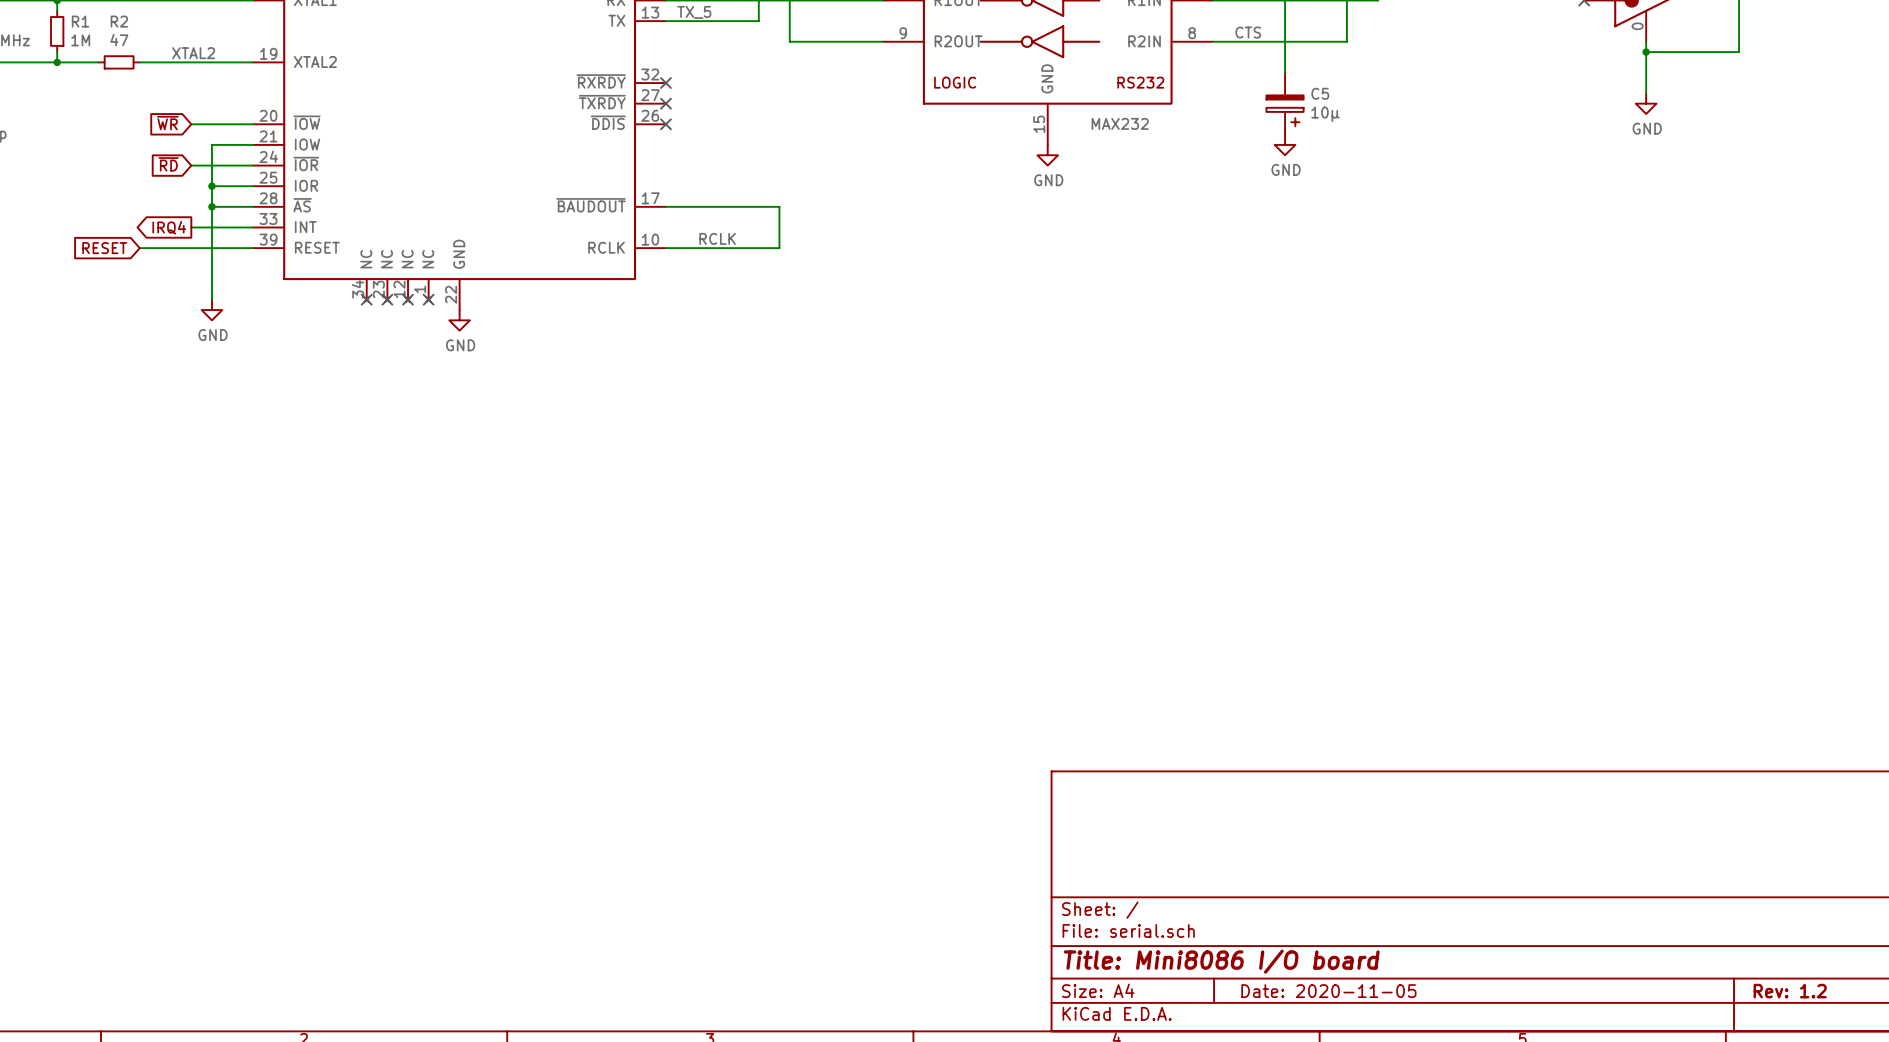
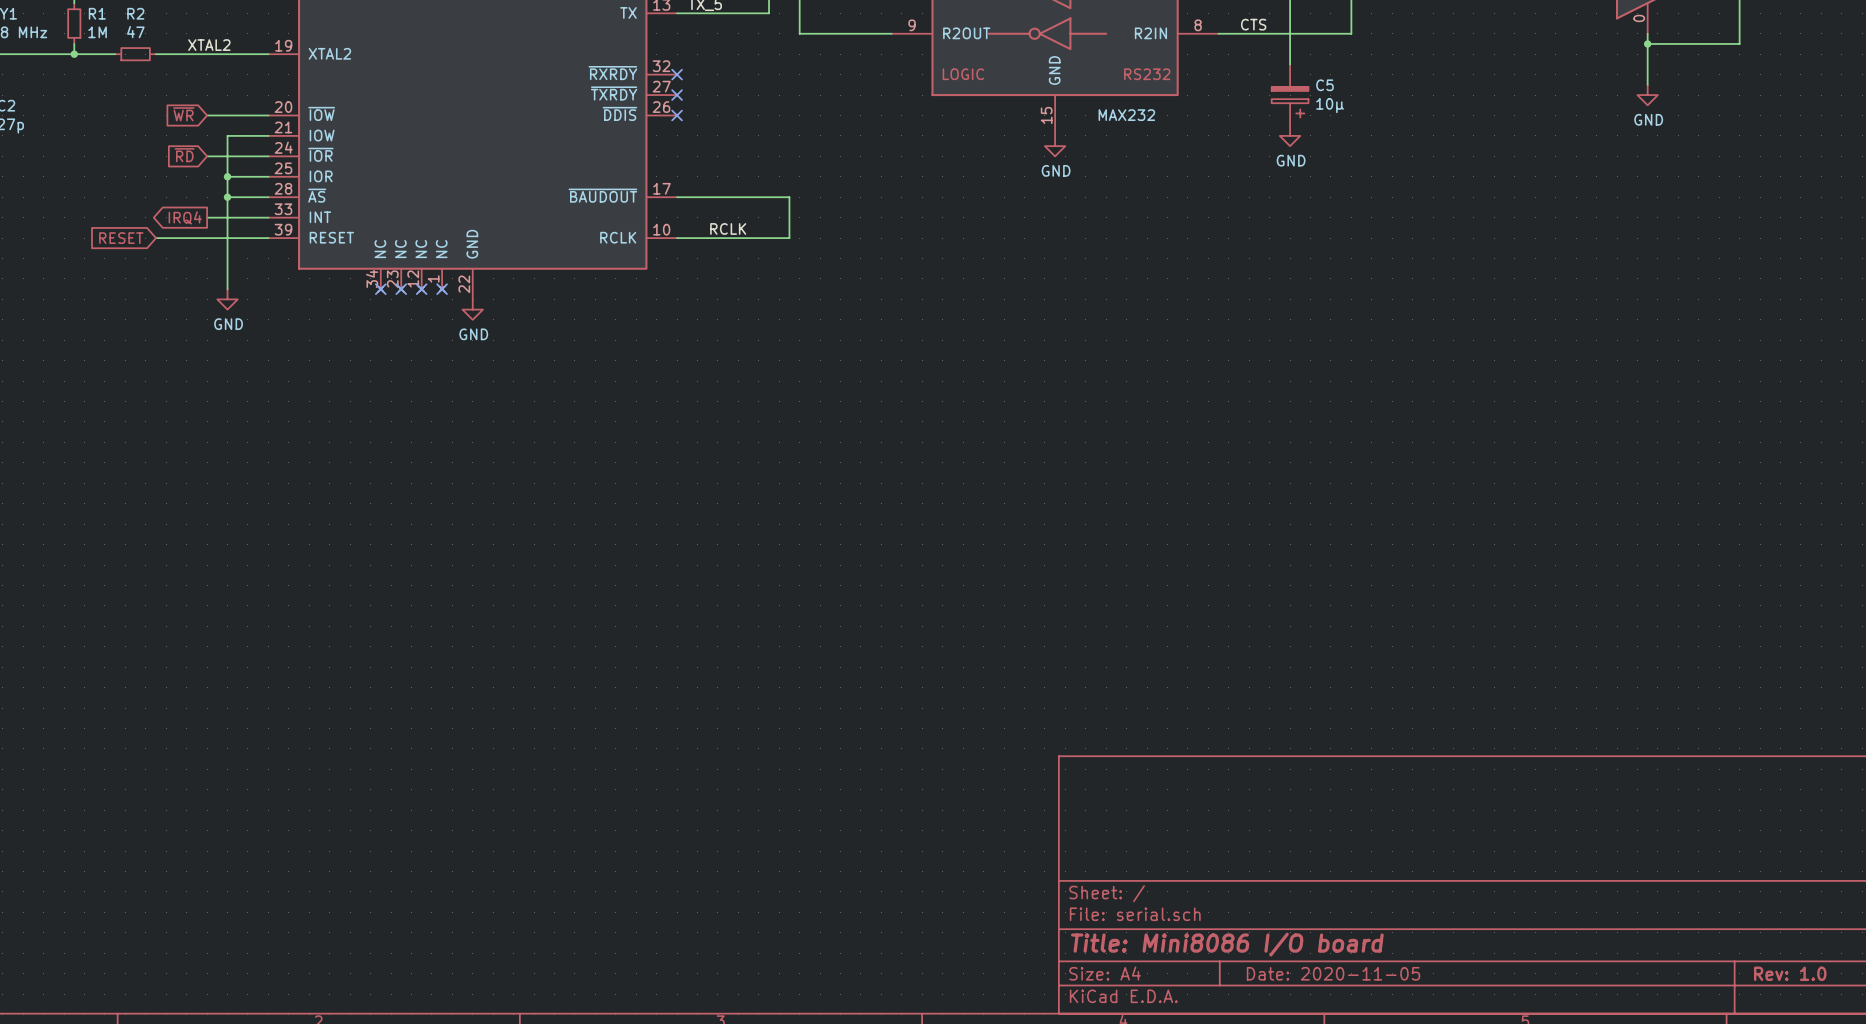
title block: Rev: 1.2 (1790, 991) -> Rev: 1.0 (1790, 973)

